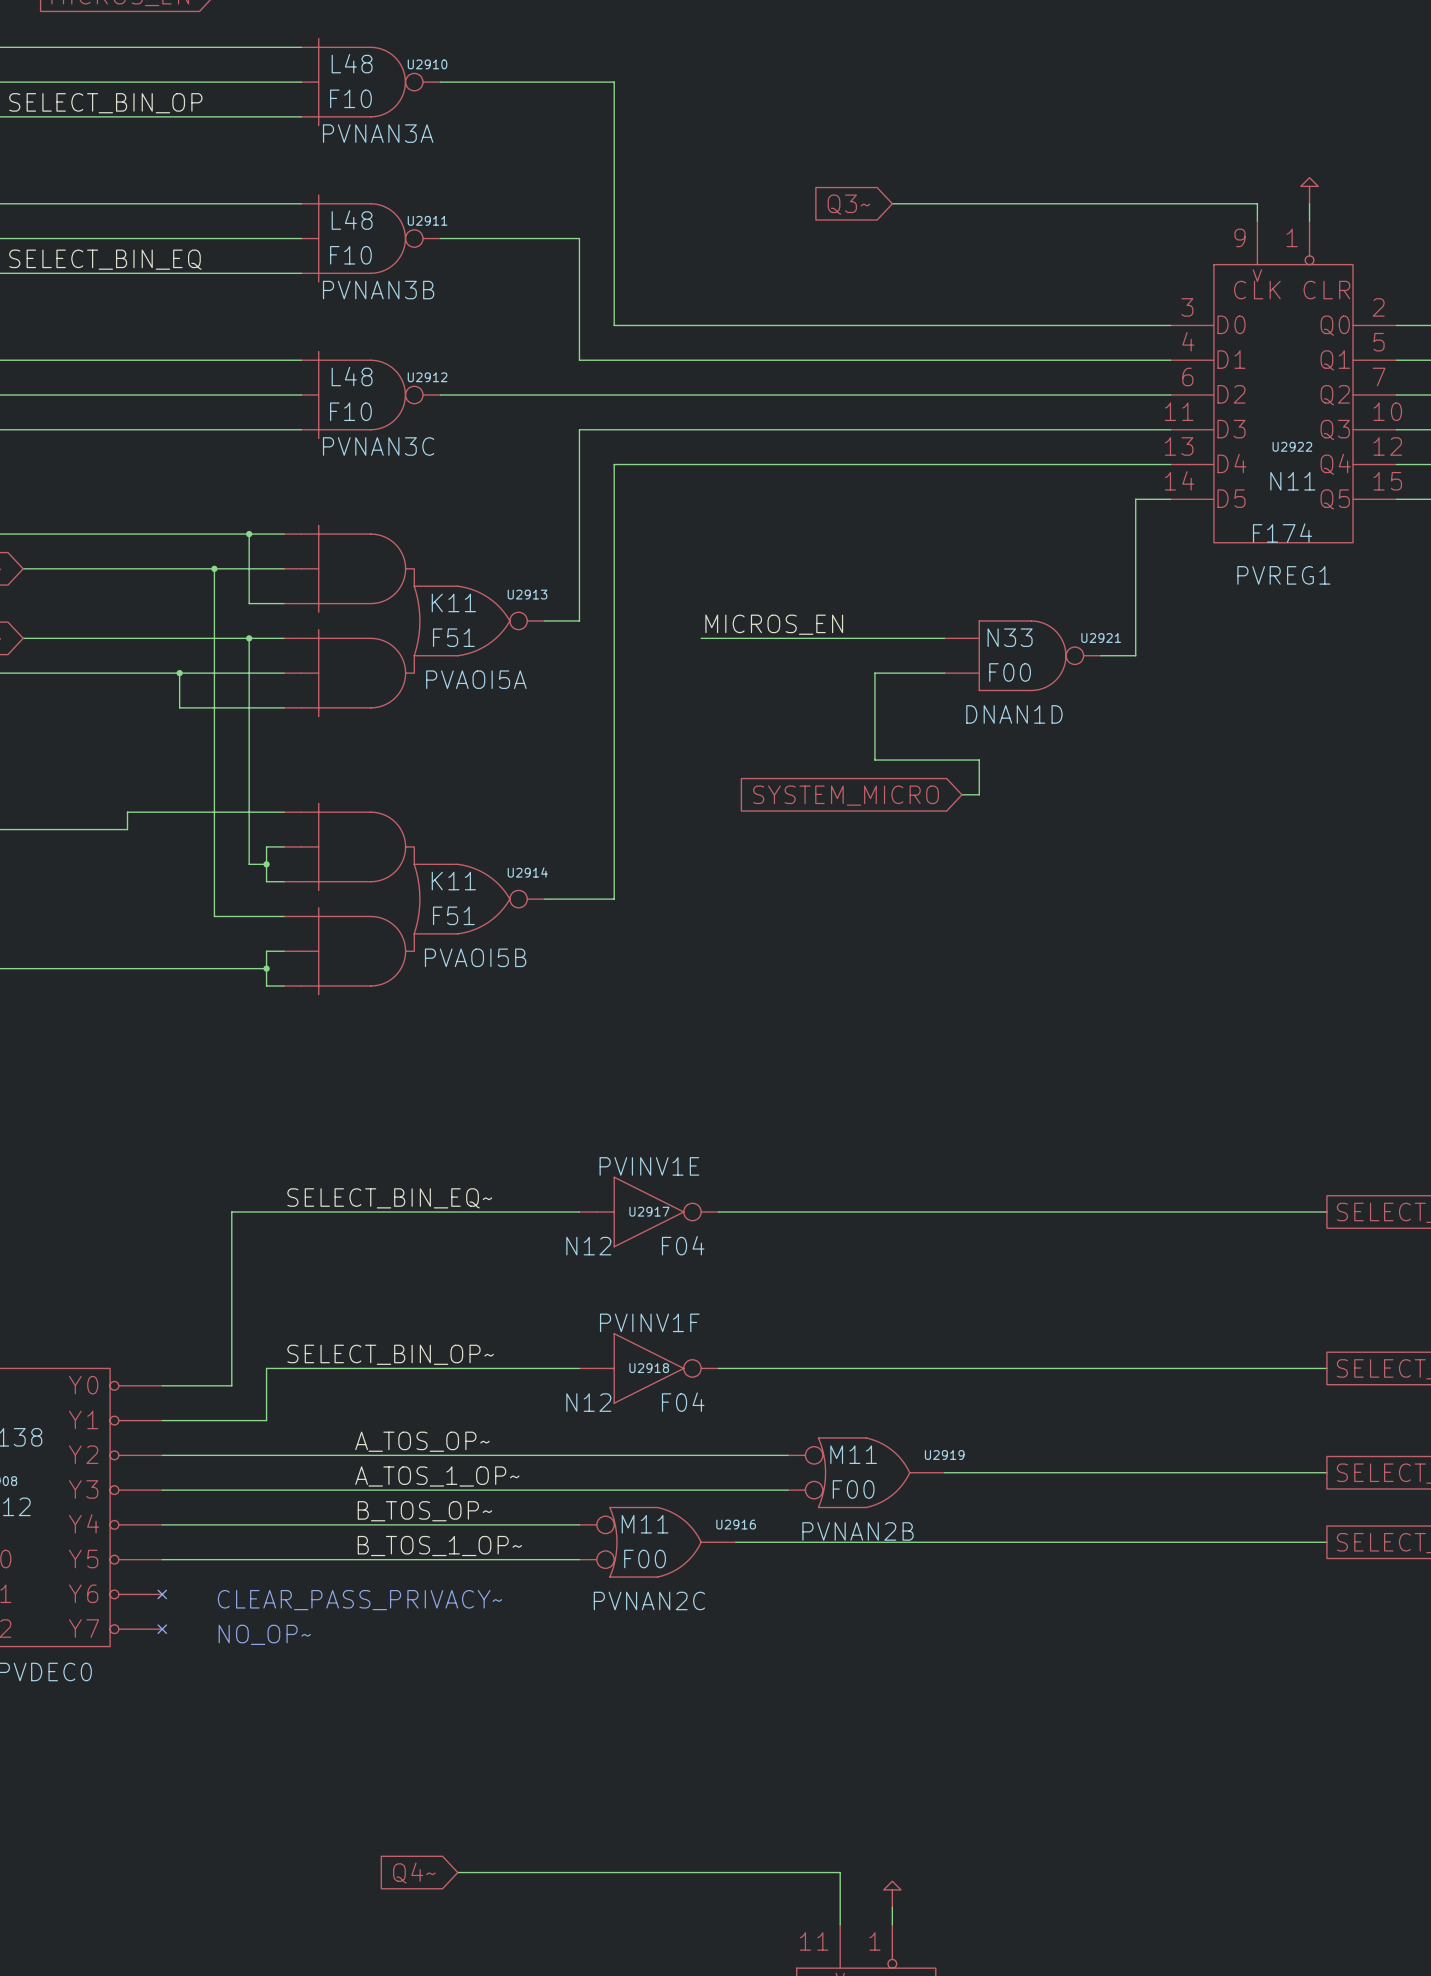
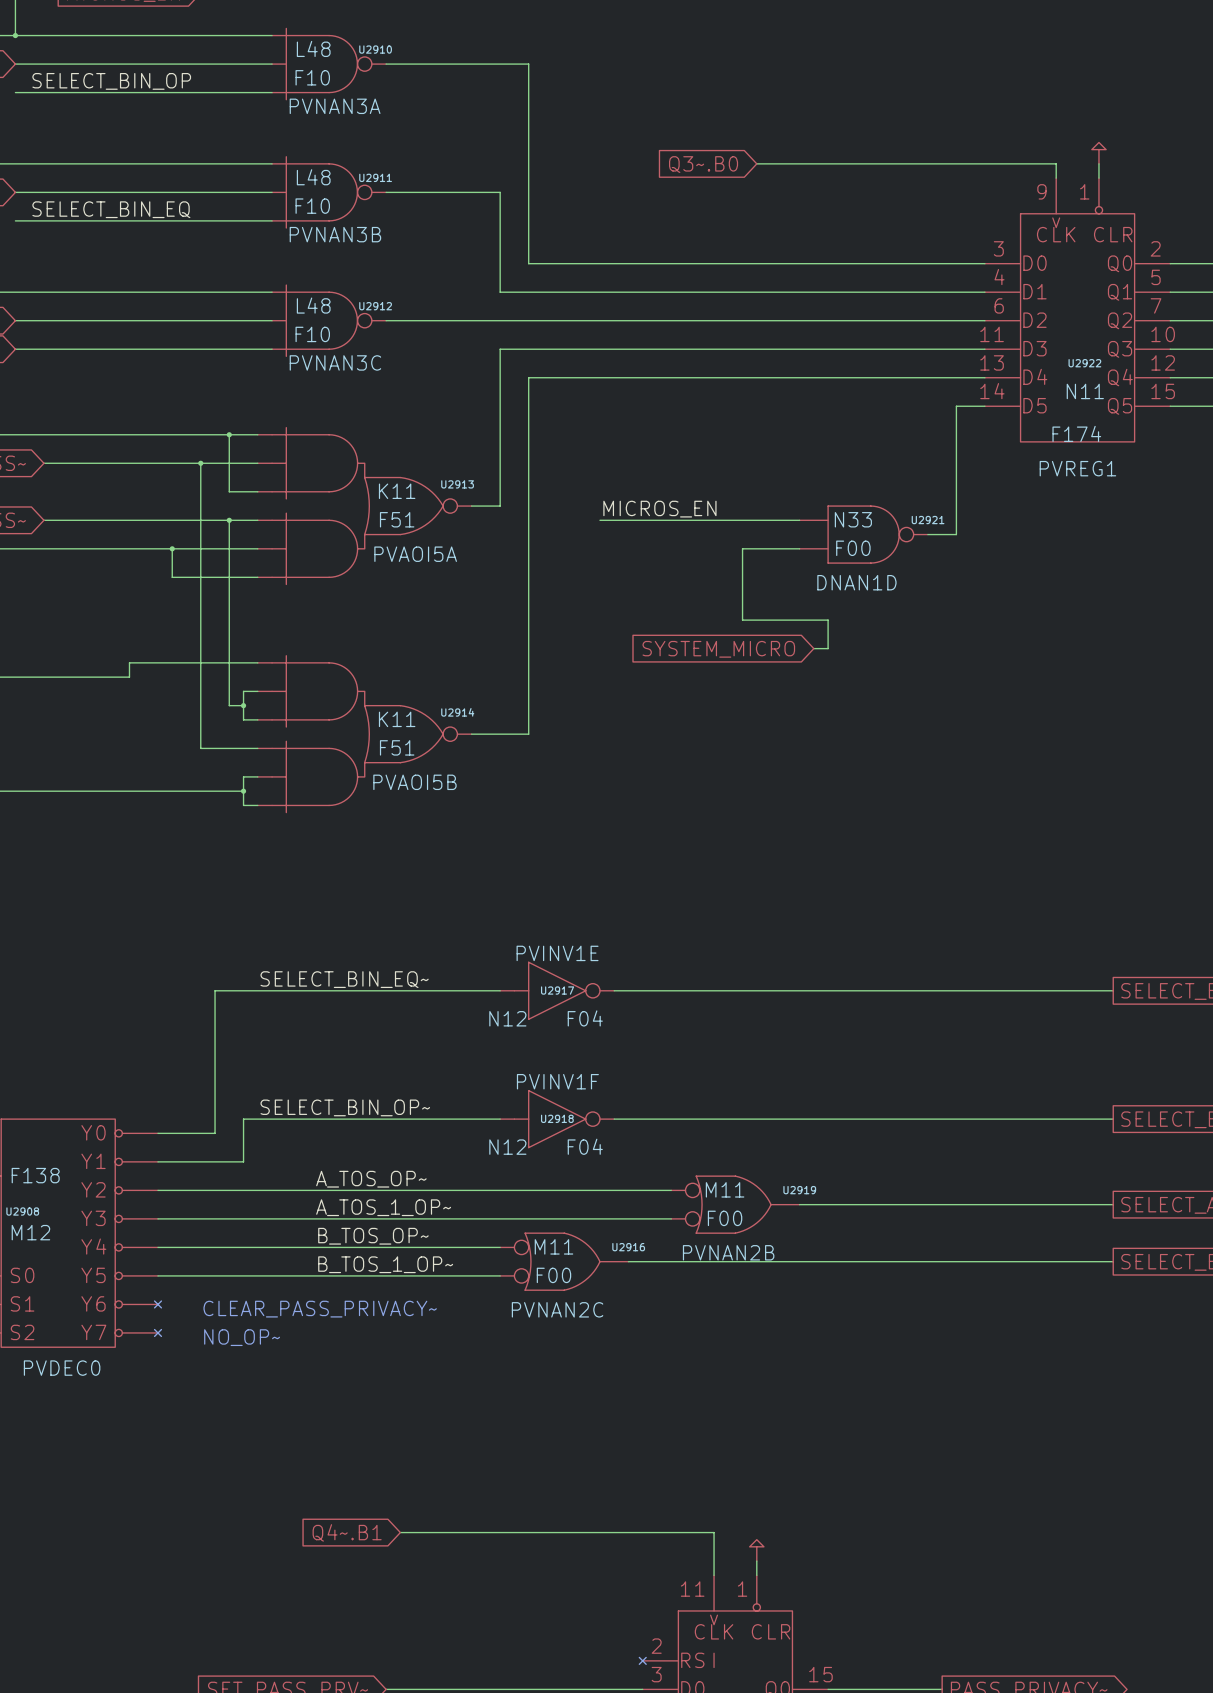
global label: Q3~ (848, 204) -> Q3~.B0 (703, 164)
global label: Q4~ (414, 1872) -> Q4~.B1 (347, 1532)

